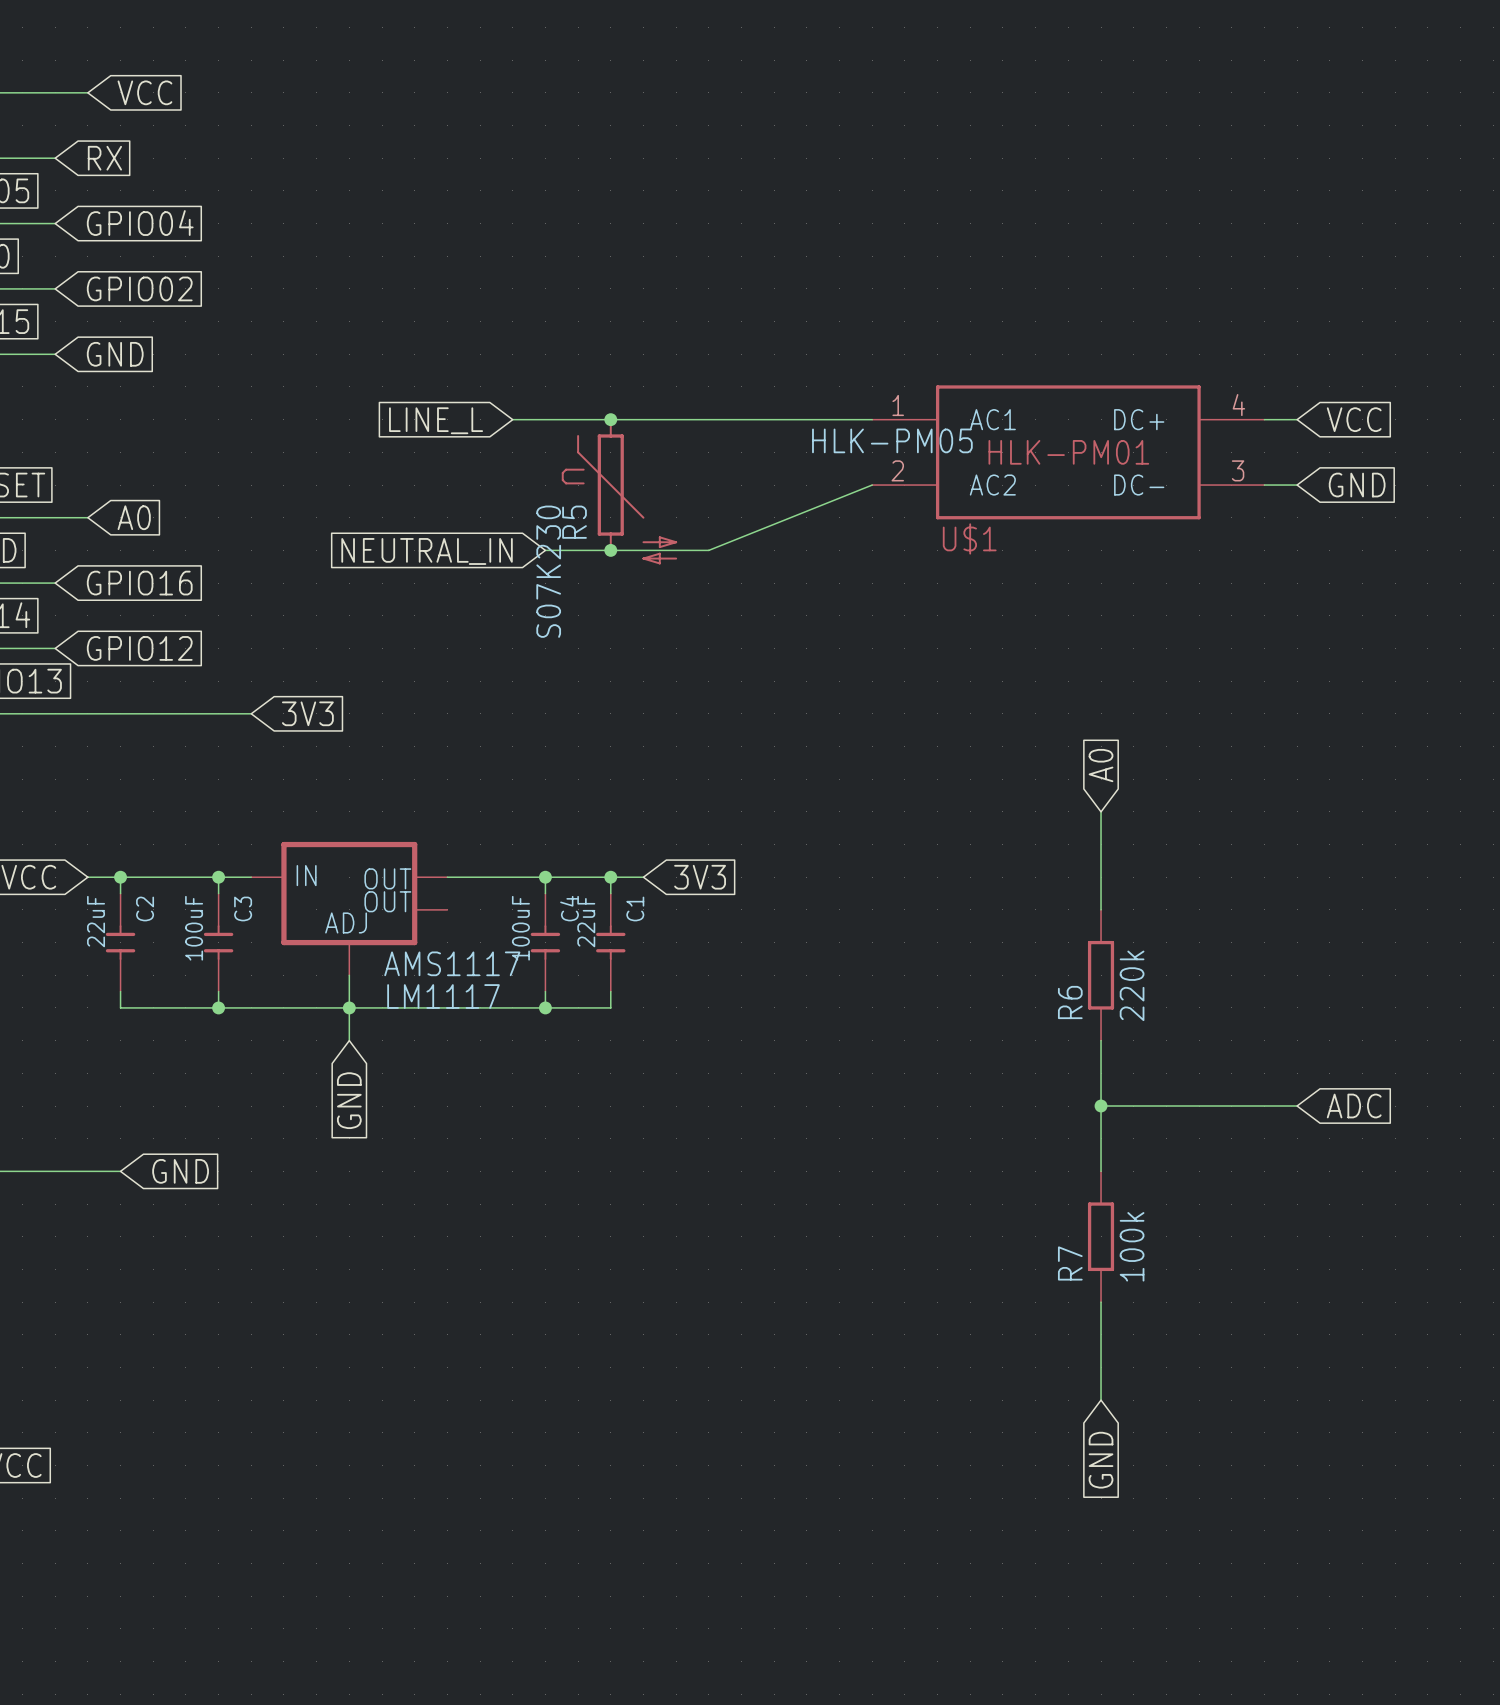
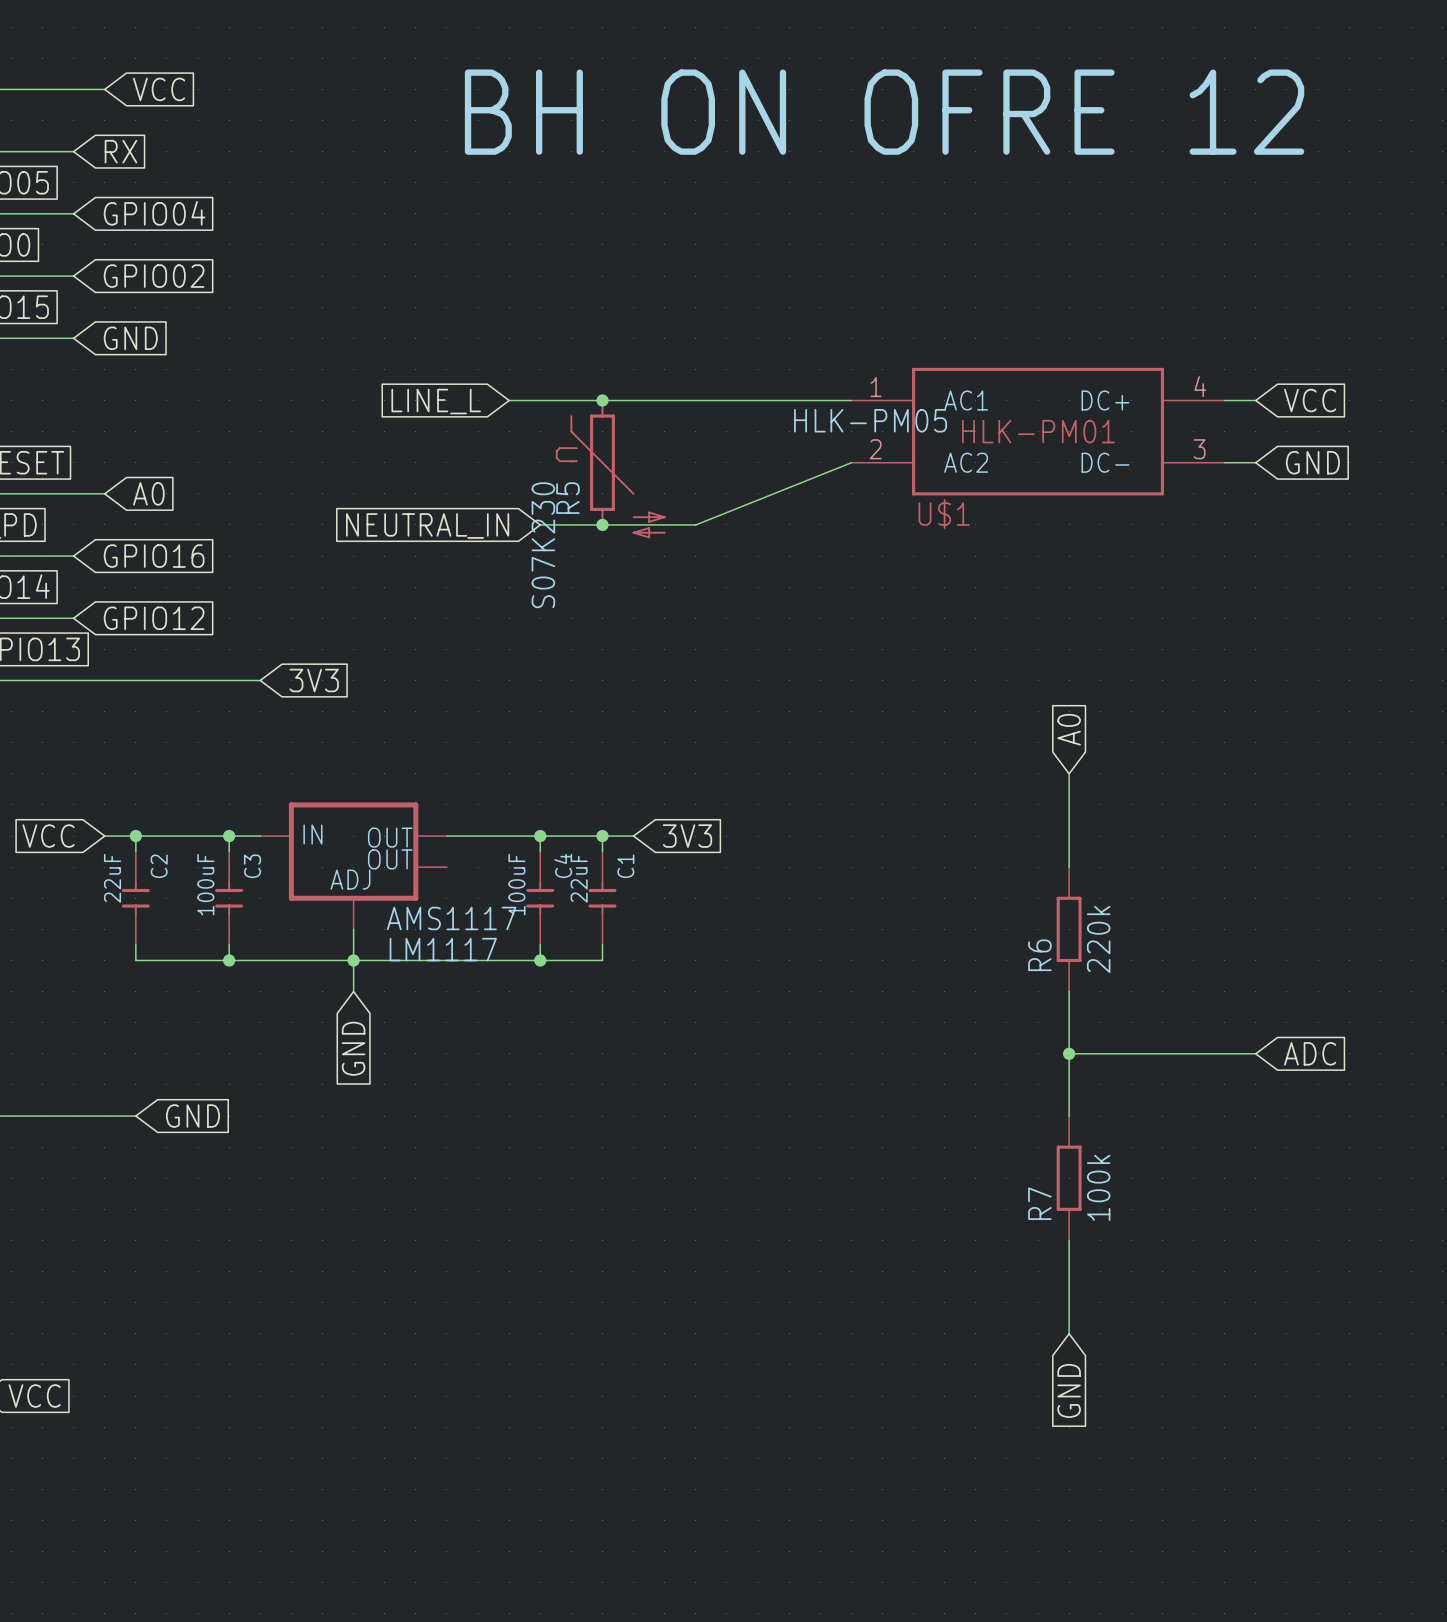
text: none -> BH ON OFRE 12 (884, 112)

